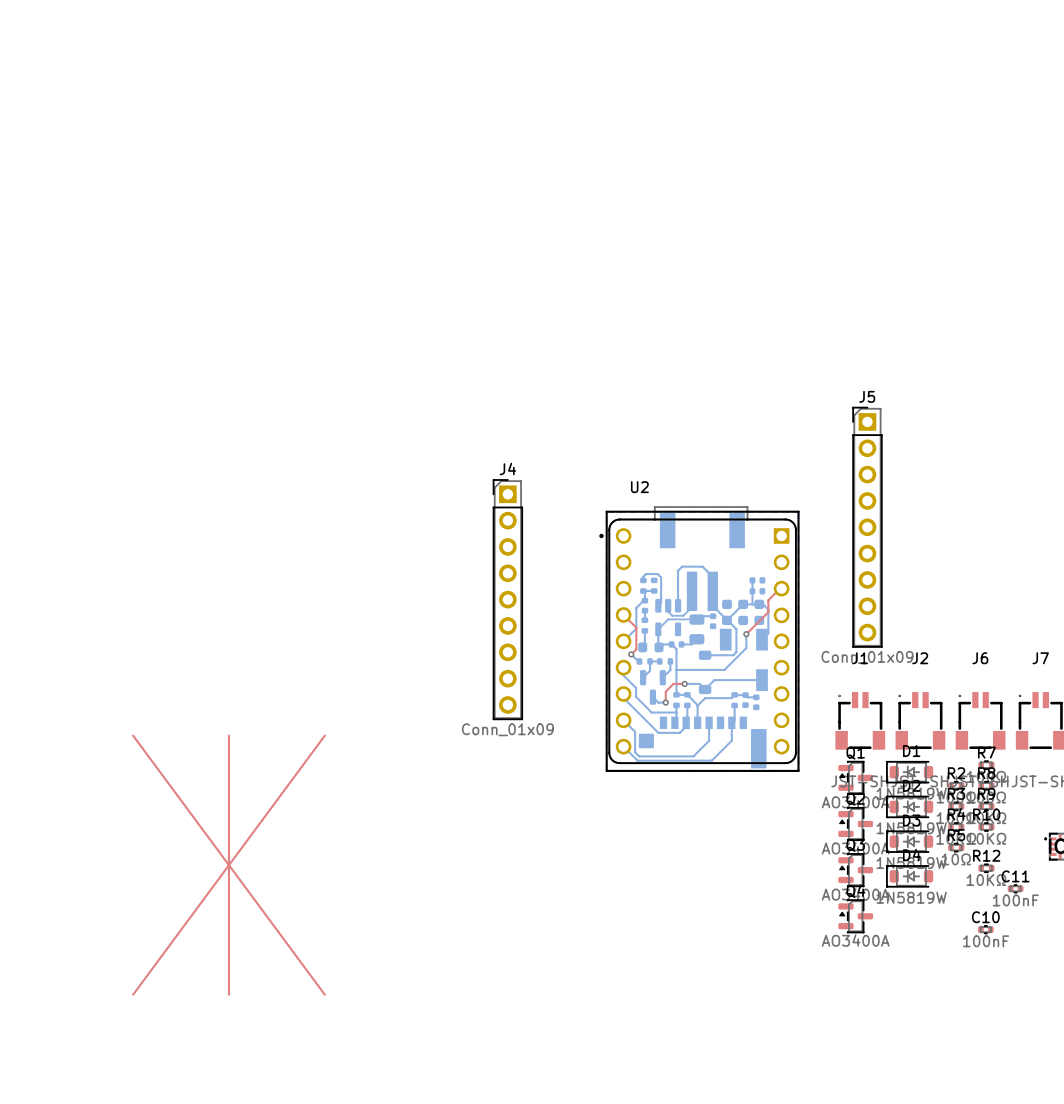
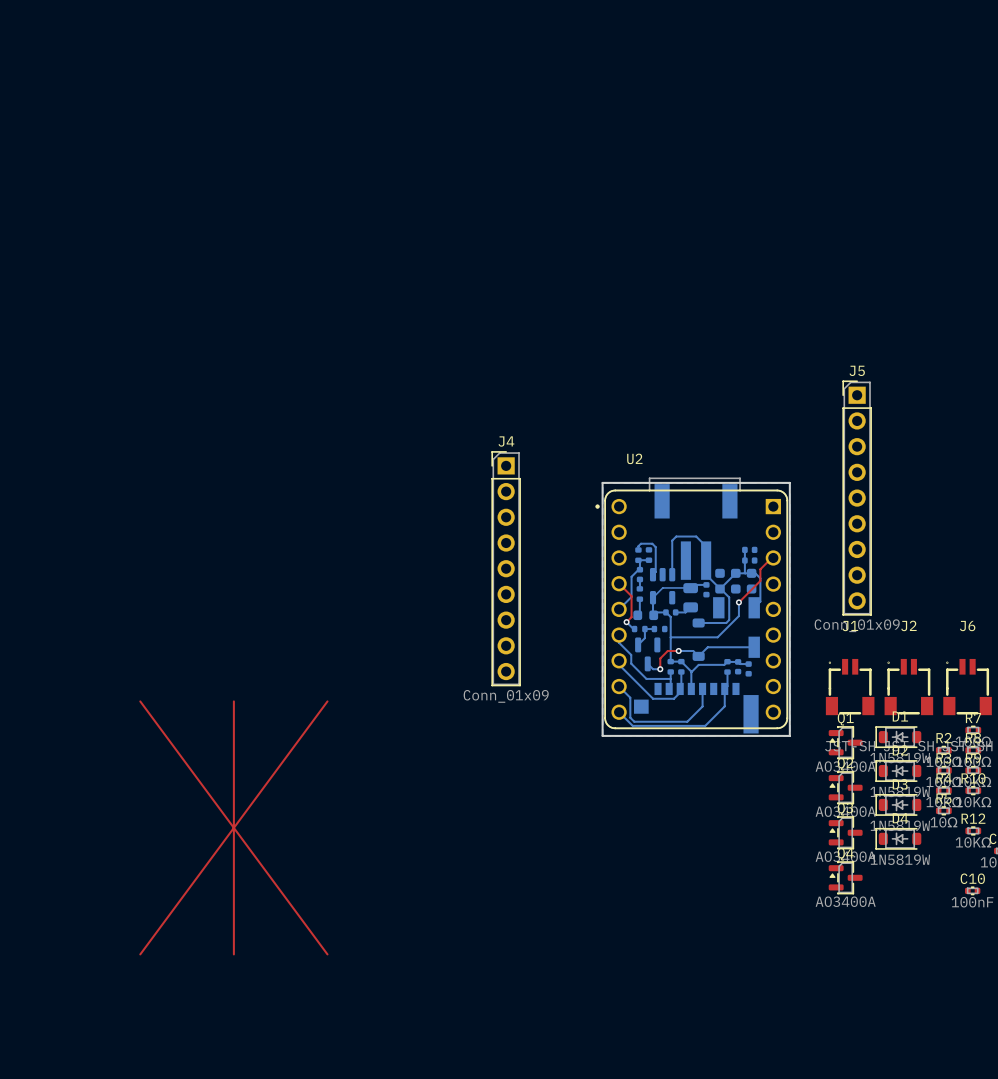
bottom track: (692, 591) (692, 607) (683, 615) (672, 615) (668, 611) (668, 605) -> none
bottom track: (670, 661) (670, 670) (662, 677) -> none

